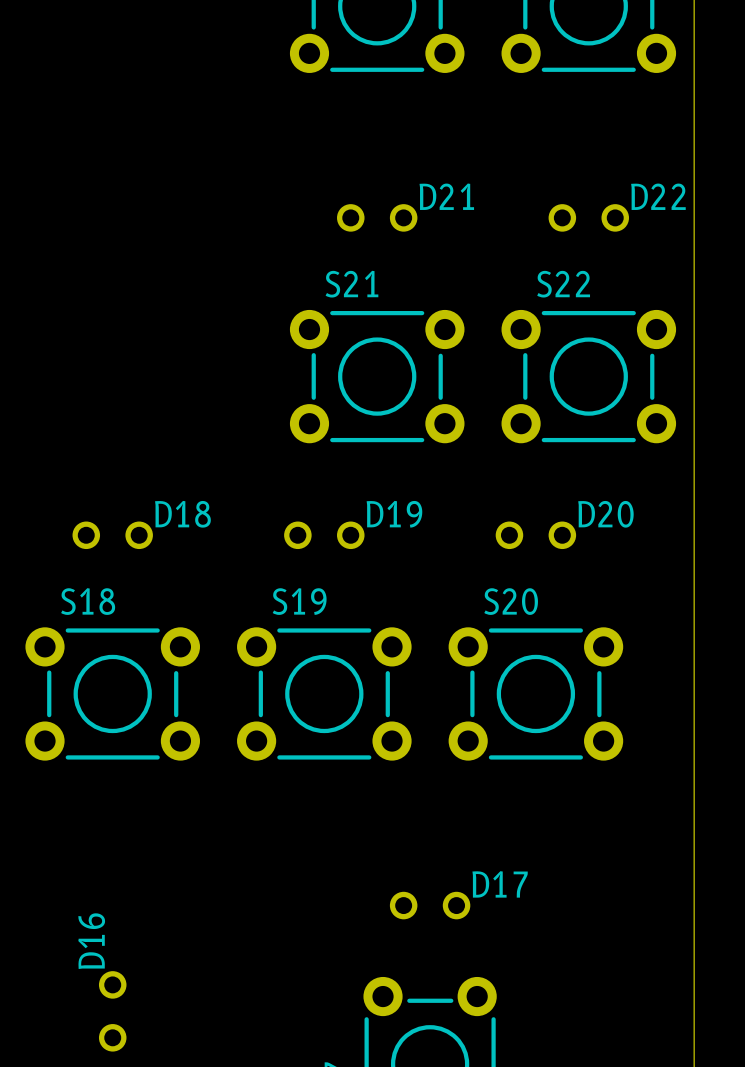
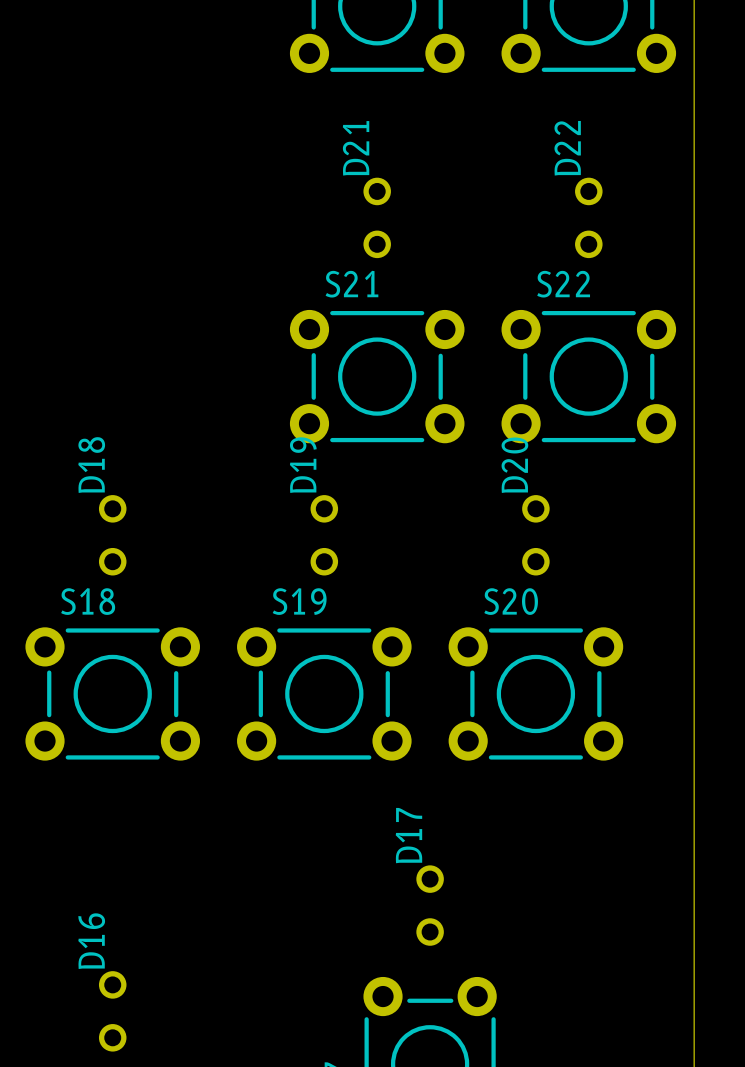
D21 name position: D21 (446, 196) -> D21 (356, 148)
D22 name position: D22 (658, 196) -> D22 (567, 148)
D21 rotation: 0° (377, 217) -> 90° clockwise (377, 217)
D22 rotation: 0° (588, 217) -> 90° clockwise (588, 217)
D18 name position: D18 (182, 514) -> D18 (91, 465)
D19 name position: D19 (394, 514) -> D19 (303, 465)
D20 name position: D20 (605, 514) -> D20 (514, 465)
D18 rotation: 0° (112, 535) -> 90° clockwise (112, 535)
D19 rotation: 0° (324, 535) -> 90° clockwise (324, 535)
D20 rotation: 0° (535, 535) -> 90° clockwise (535, 535)
D17 name position: D17 (500, 884) -> D17 (408, 835)
D17 rotation: 0° (430, 905) -> 90° clockwise (430, 905)

